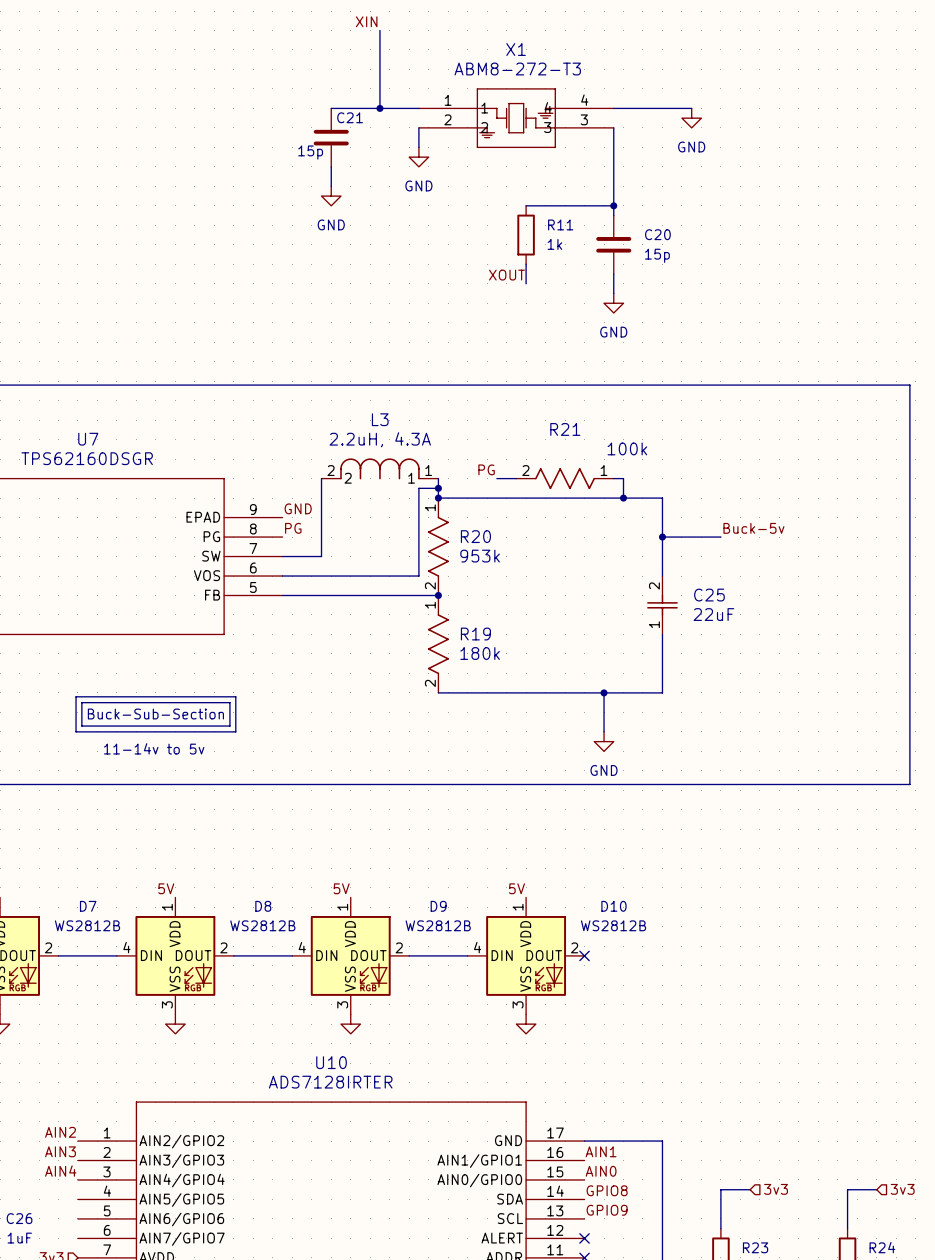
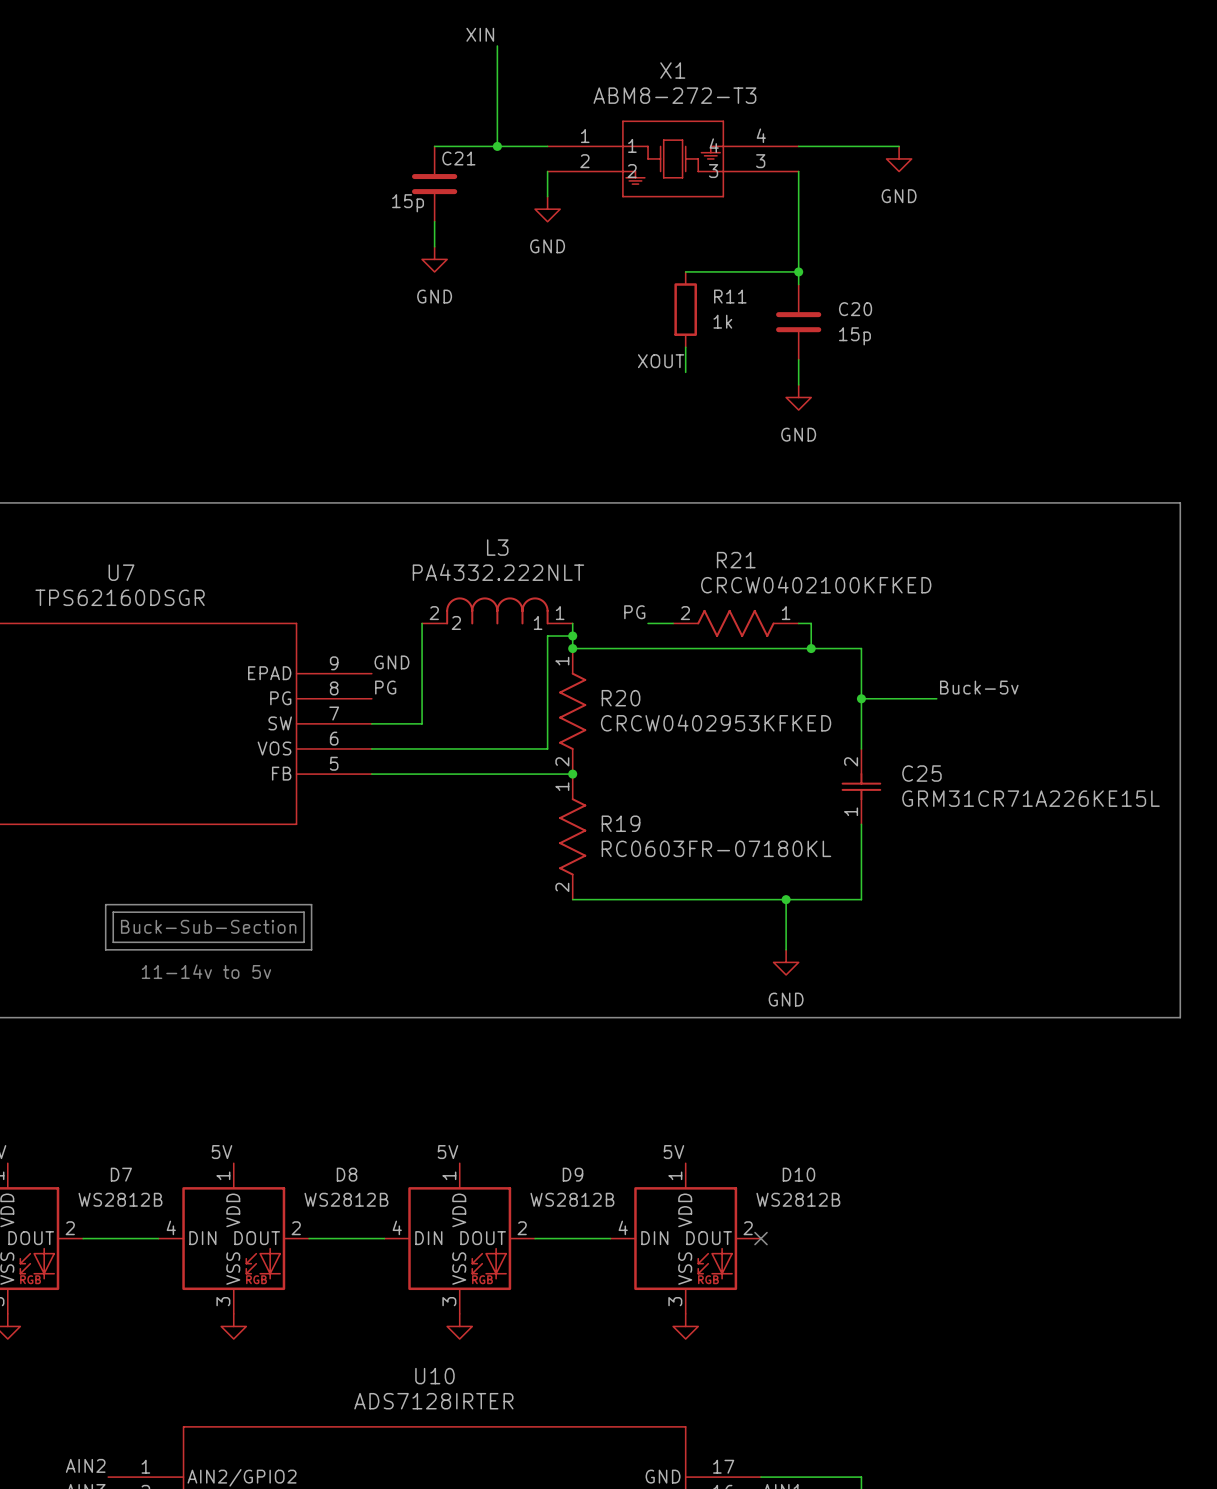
L3 value: 2.2uH, 4.3A (380, 439) -> PA4332.222NLT (498, 572)
R21 value: 100k (627, 448) -> CRCW0402100KFKED (816, 584)
R20 value: 953k (480, 556) -> CRCW0402953KFKED (716, 722)
C25 value: 22uF (713, 614) -> GRM31CR71A226KE15L (1031, 798)
R19 value: 180k (480, 653) -> RC0603FR-07180KL (716, 848)

